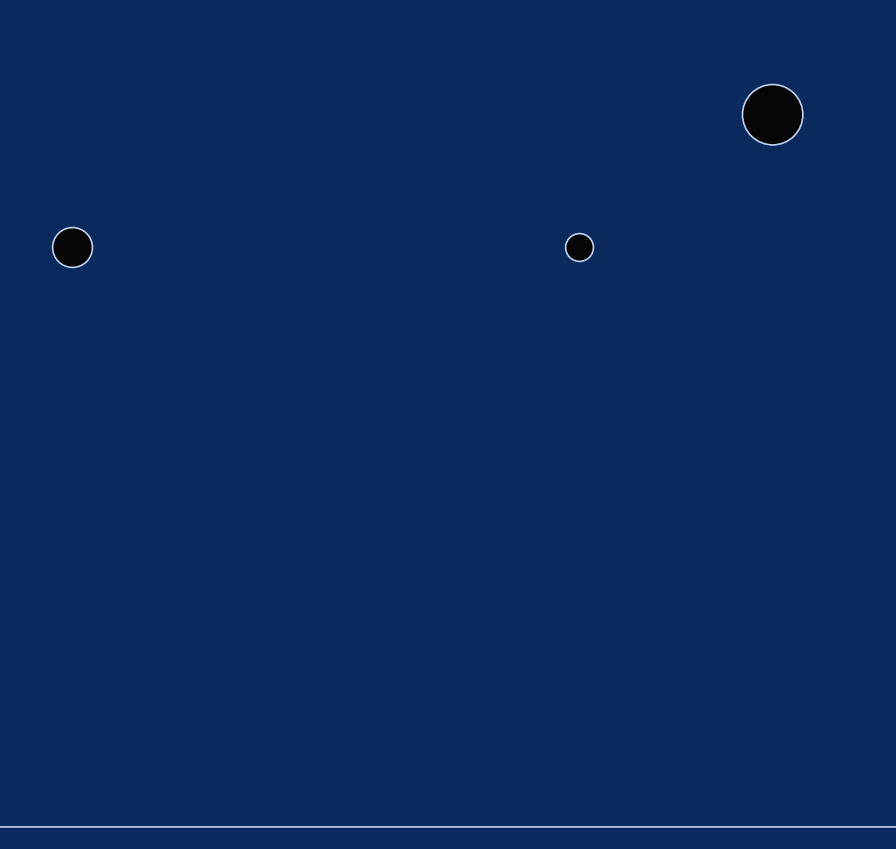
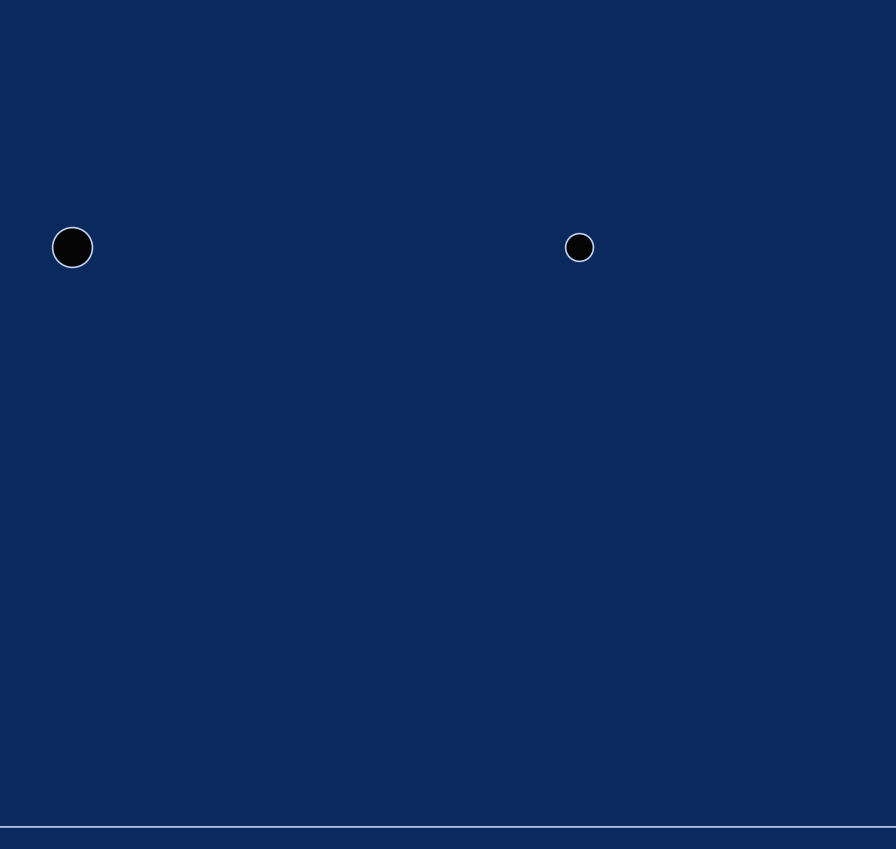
part: (772, 114) -> none

